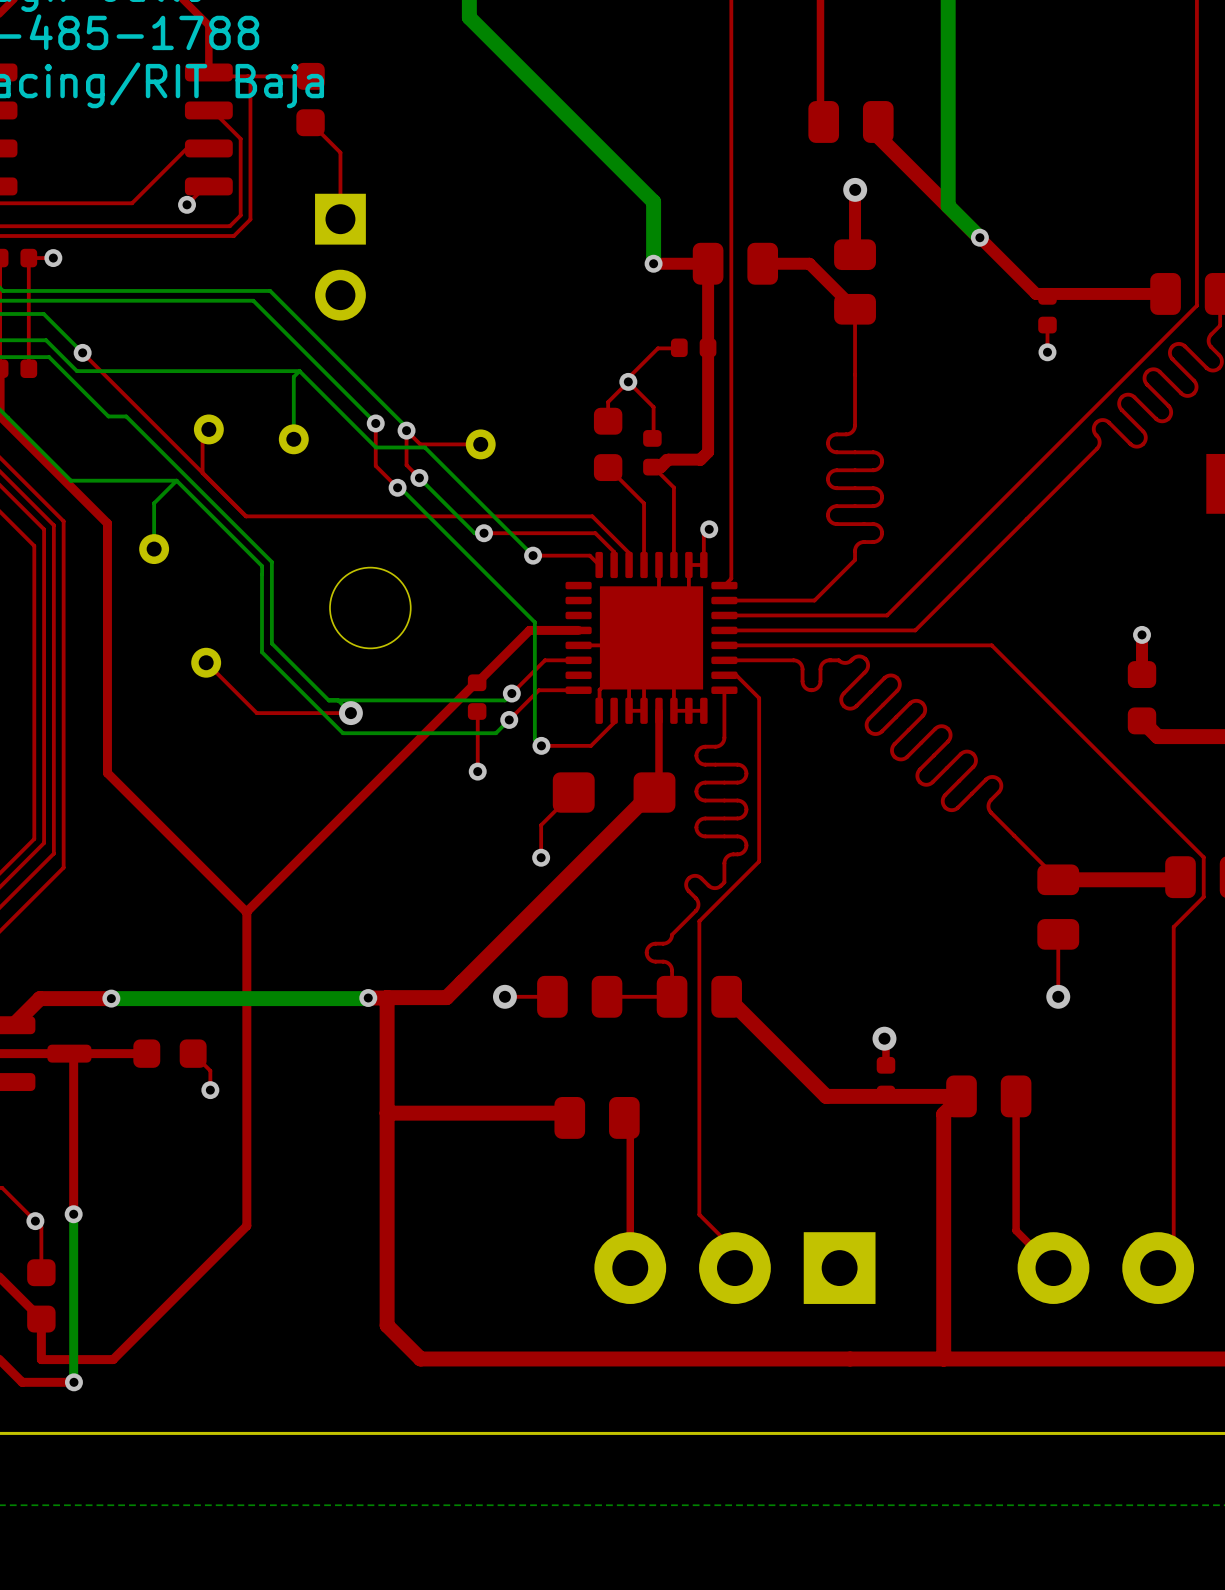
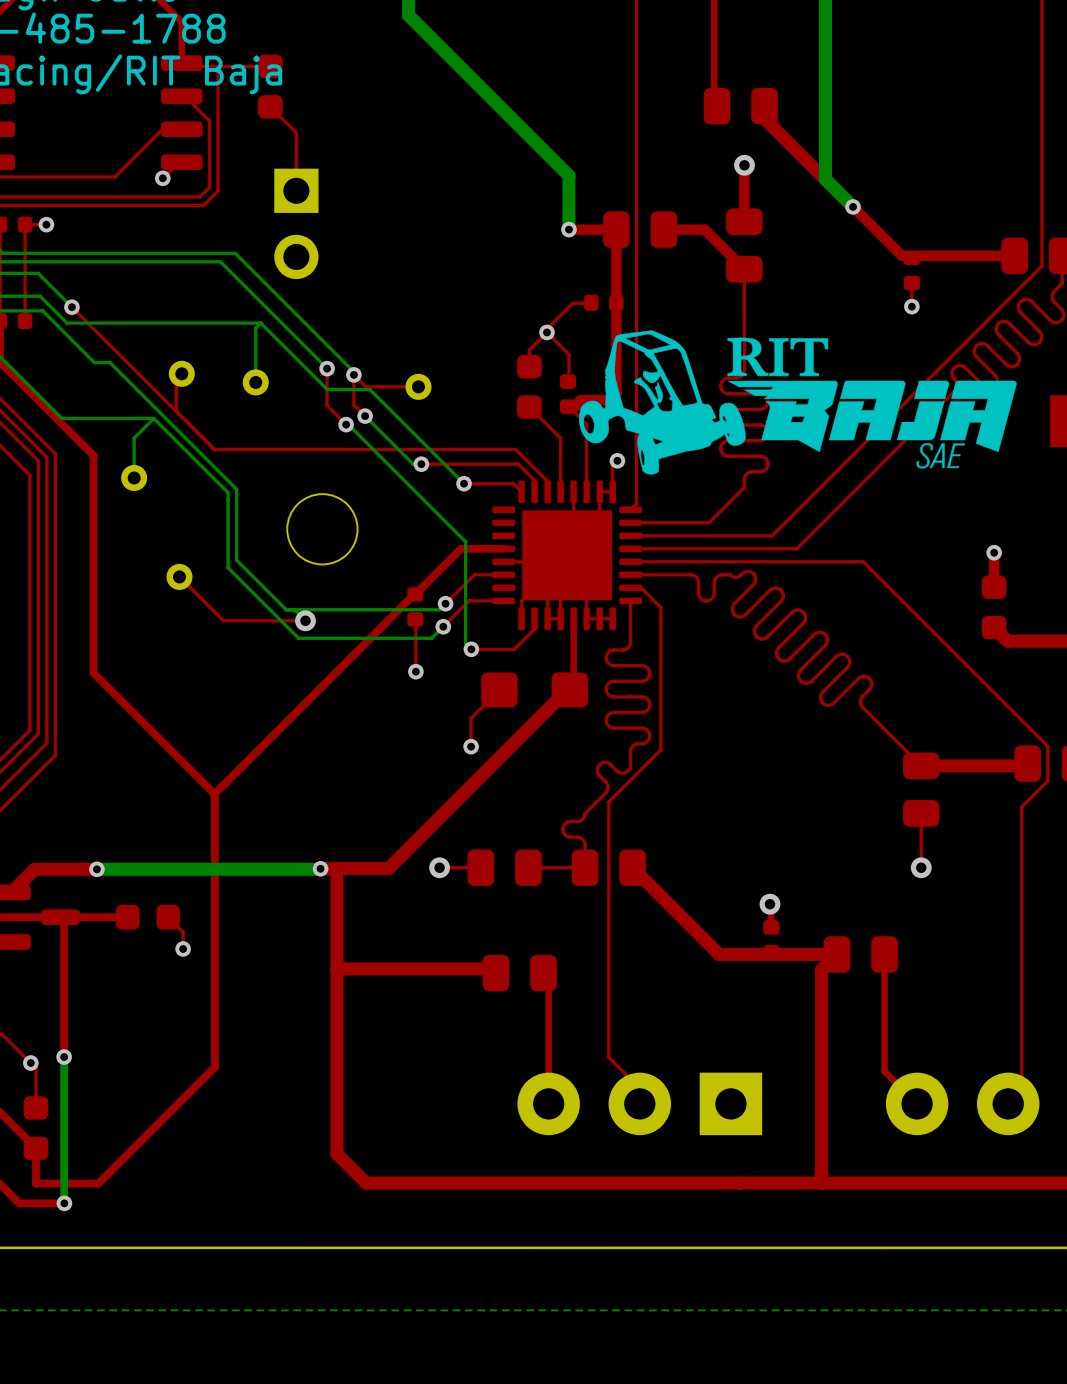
drawing: none -> [579, 330, 1017, 475]

